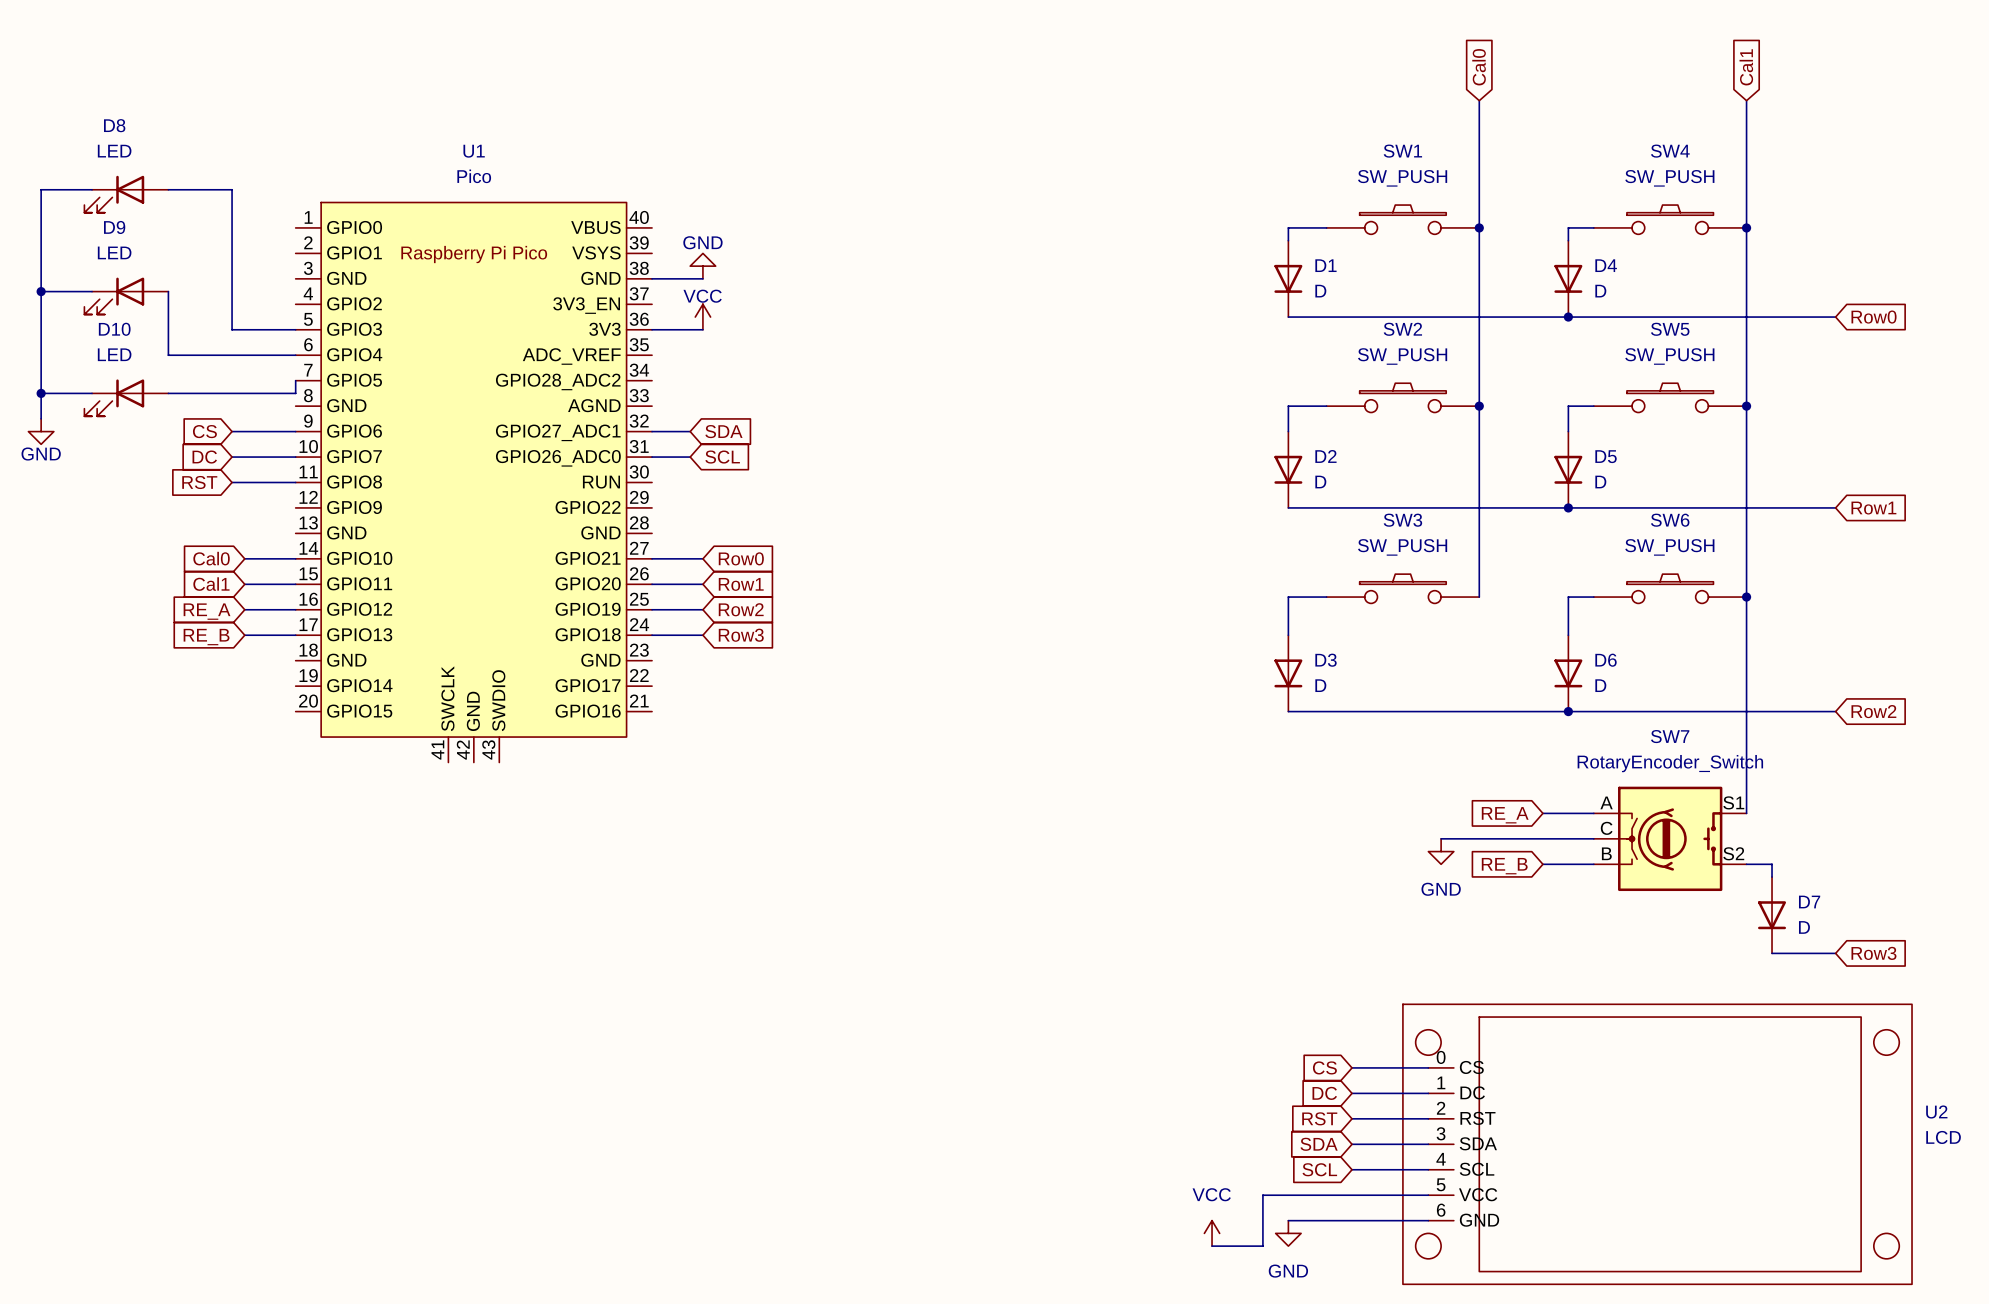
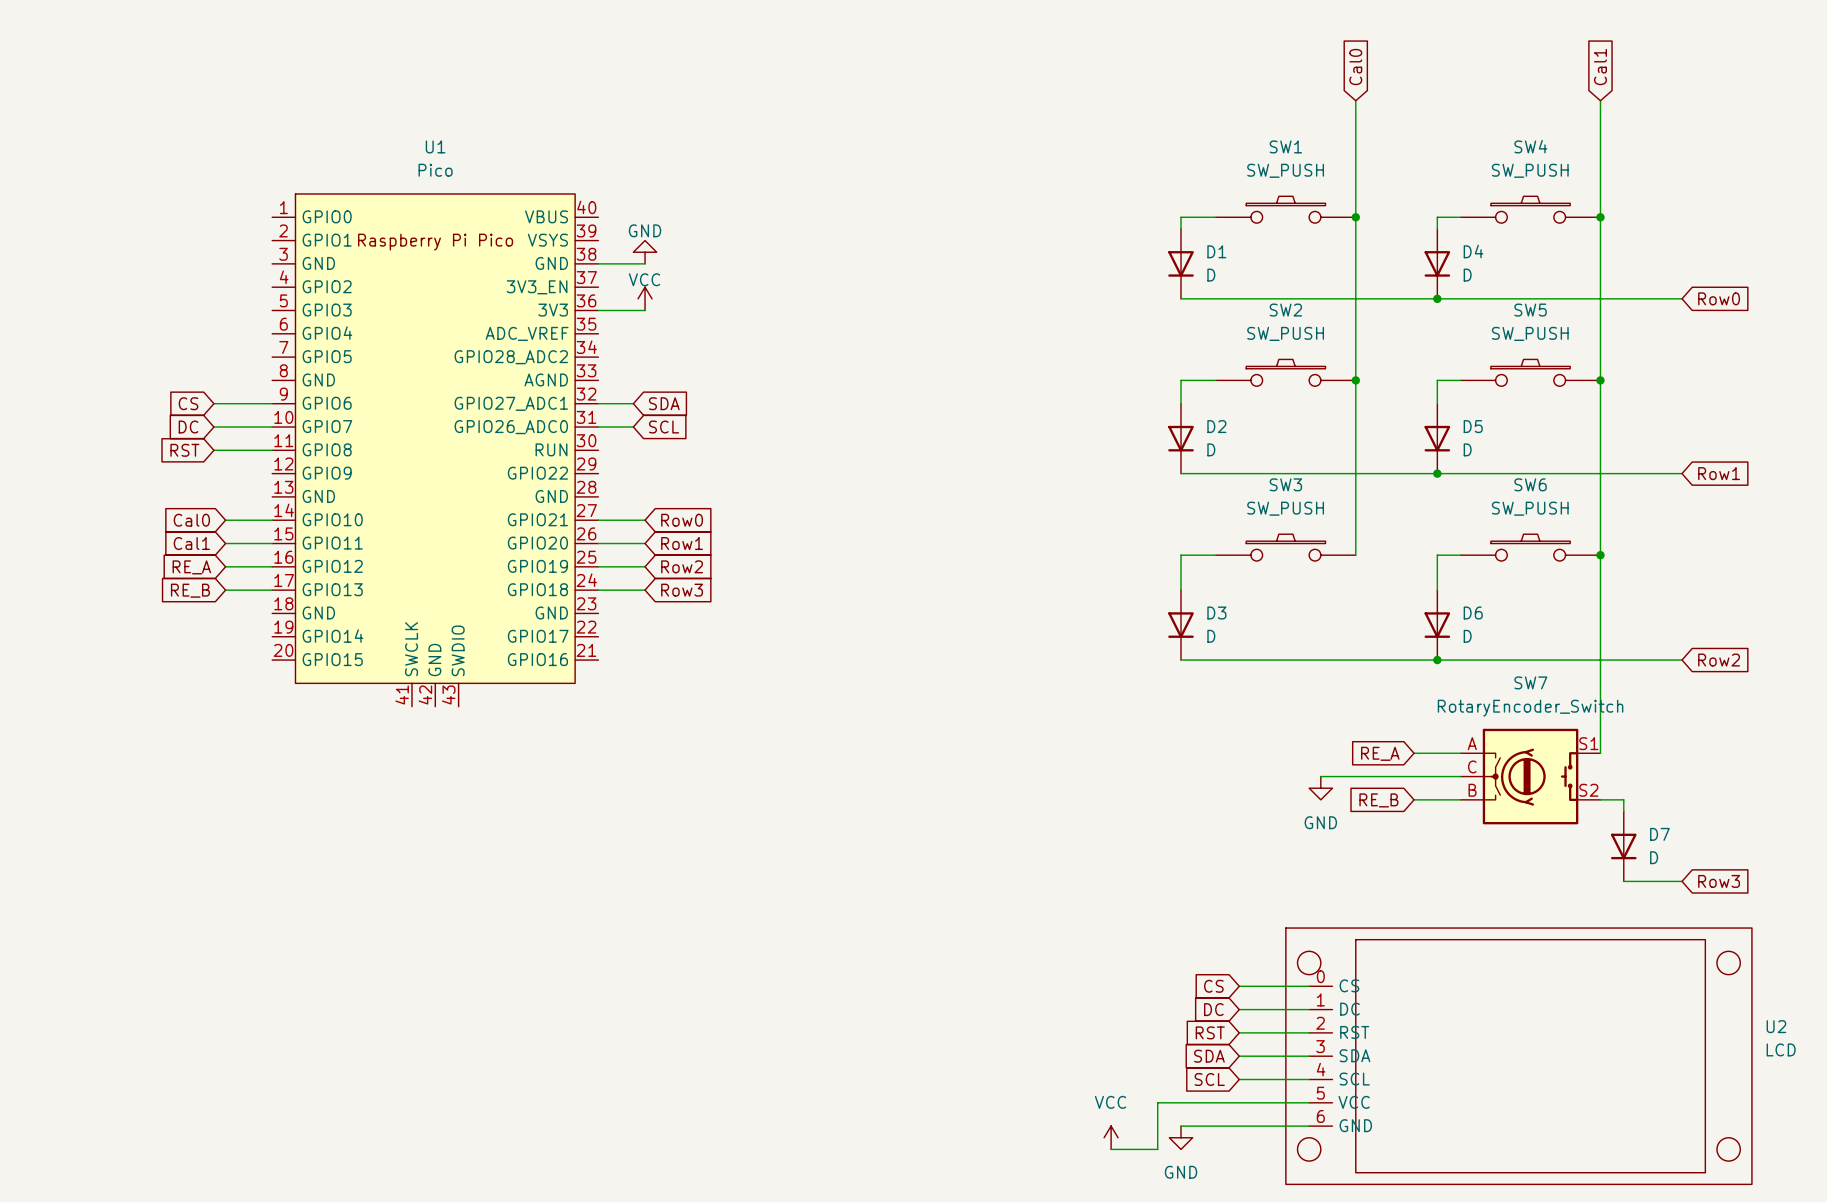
wire: (92, 189) (41, 189) (41, 418) -> none
wire: (168, 189) (232, 189) (232, 329) (295, 329) -> none
D8: LED (126, 194) -> none
wire: (41, 291) (92, 291) -> none
junction: (41, 291) -> none
wire: (168, 291) (168, 355) (295, 355) -> none
D9: LED (126, 296) -> none
wire: (295, 380) (295, 393) (168, 393) -> none
wire: (41, 393) (92, 393) -> none
junction: (41, 393) -> none
D10: LED (126, 397) -> none
power symbol: GND (41, 431) -> none

